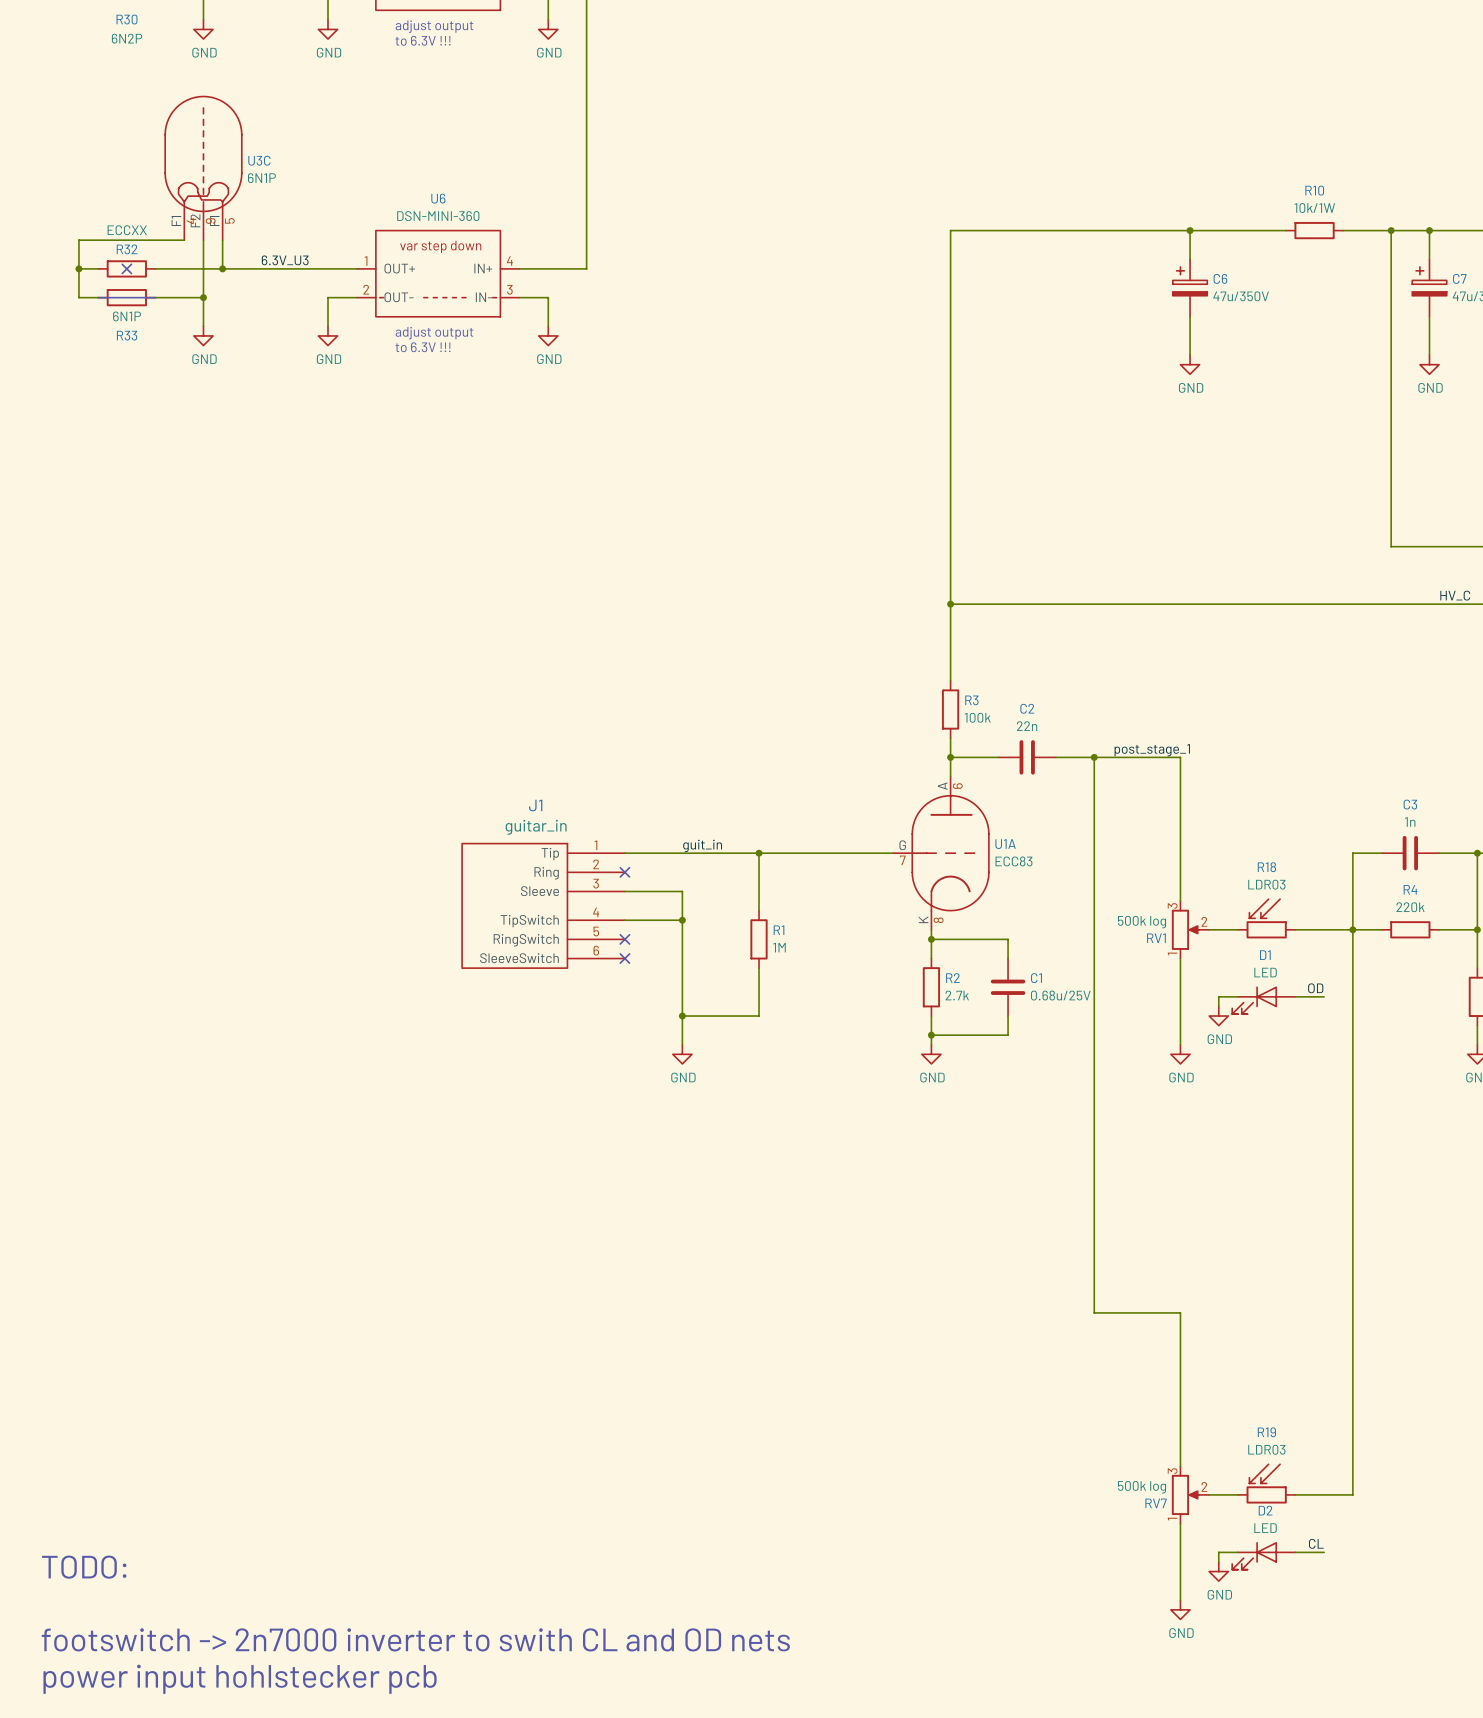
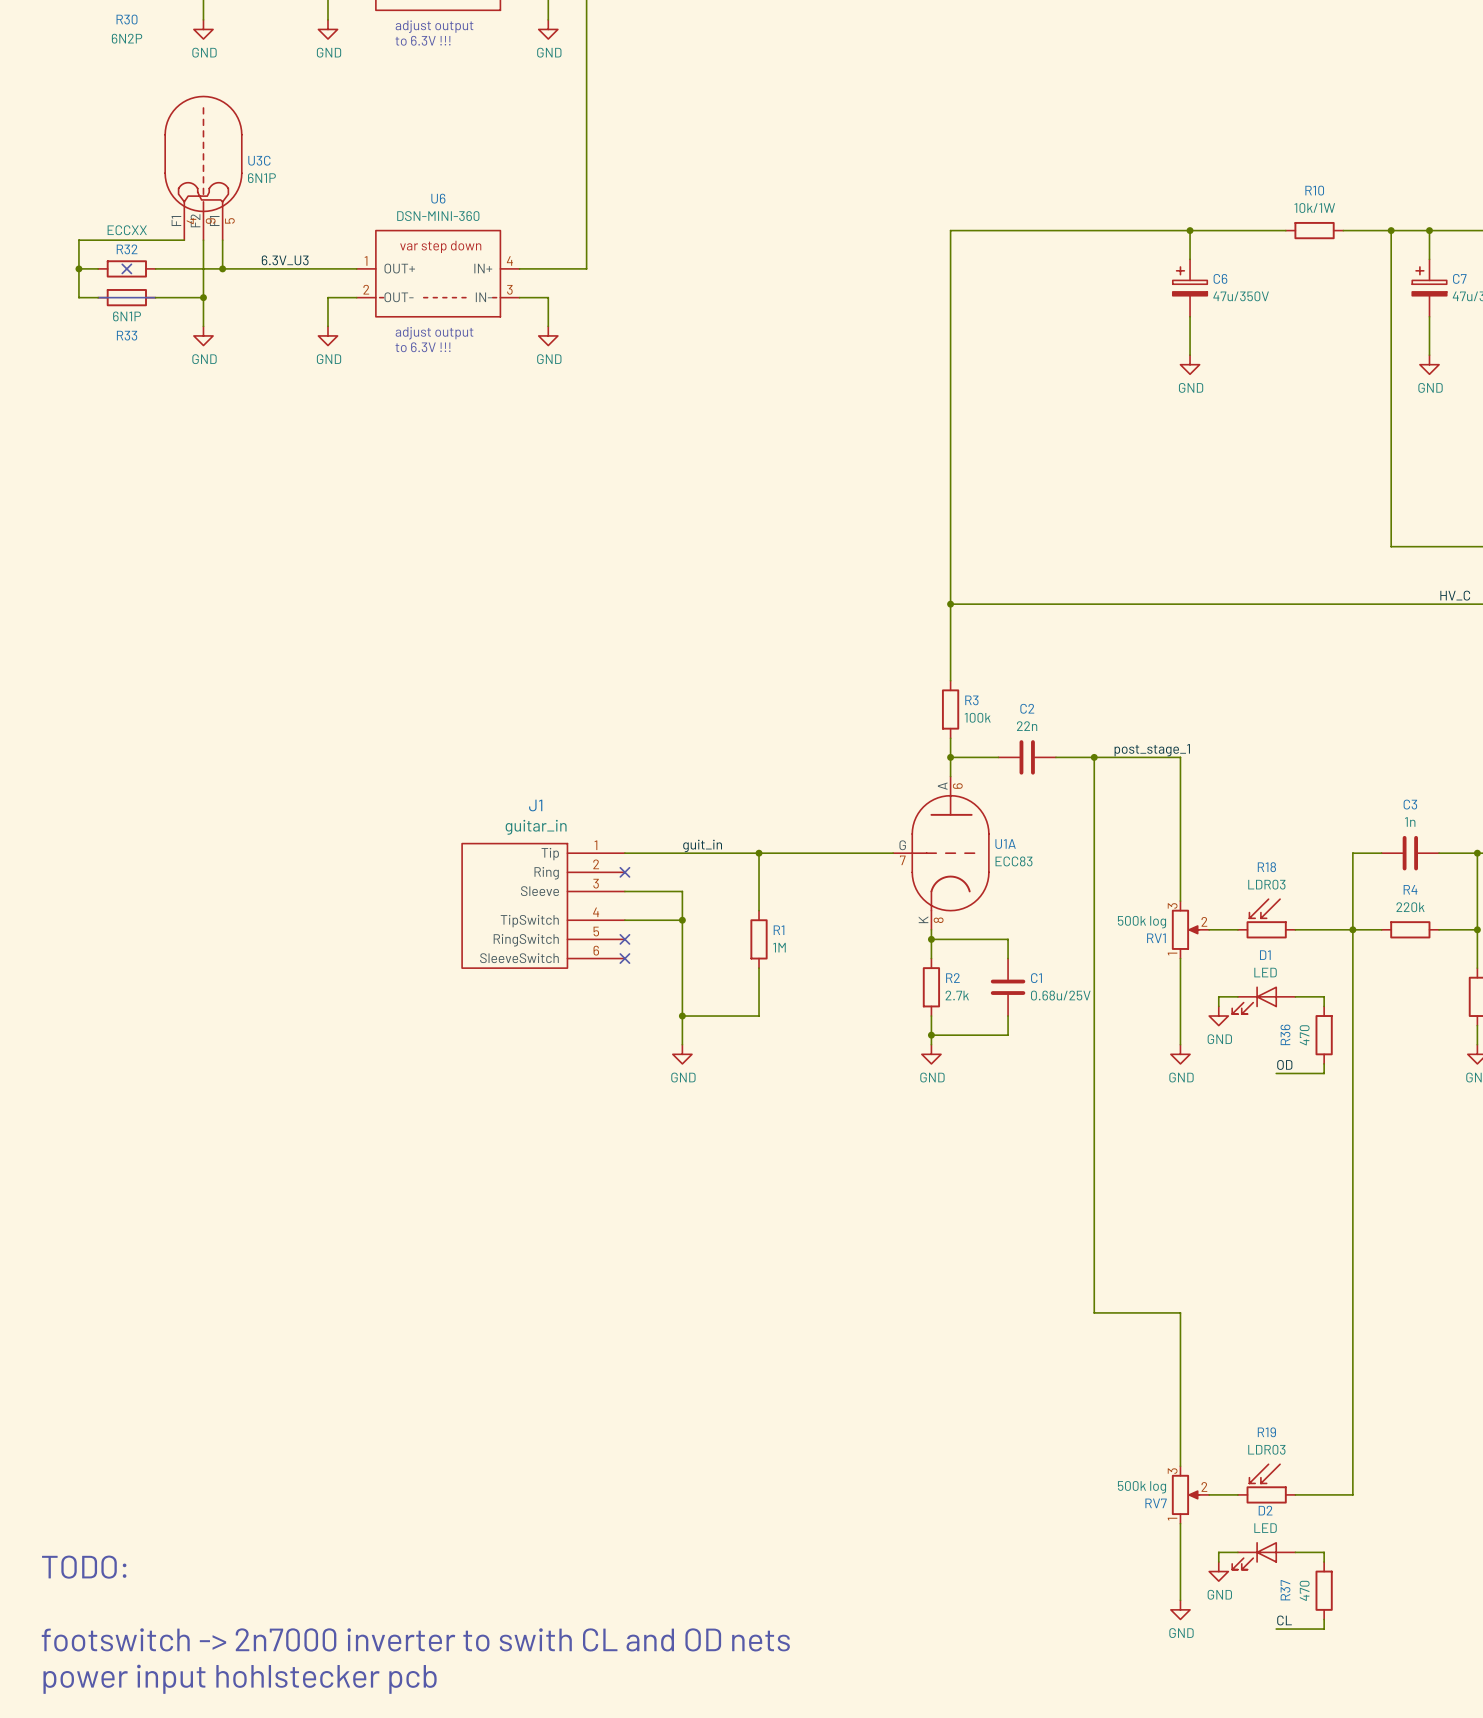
label position: OD (1315, 988) -> OD (1284, 1064)
wire: none -> (1324, 996) (1324, 1006)
R36: none -> 470 (1324, 1035)
wire: none -> (1324, 1063) (1324, 1073) (1276, 1073)
label position: CL (1316, 1543) -> CL (1284, 1620)
wire: none -> (1324, 1552) (1324, 1561)
R37: none -> 470 (1324, 1590)
wire: none -> (1324, 1619) (1324, 1629) (1276, 1629)

